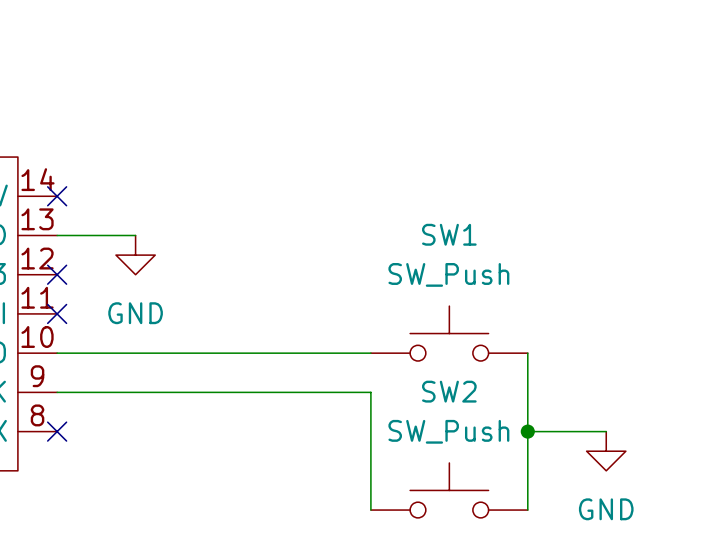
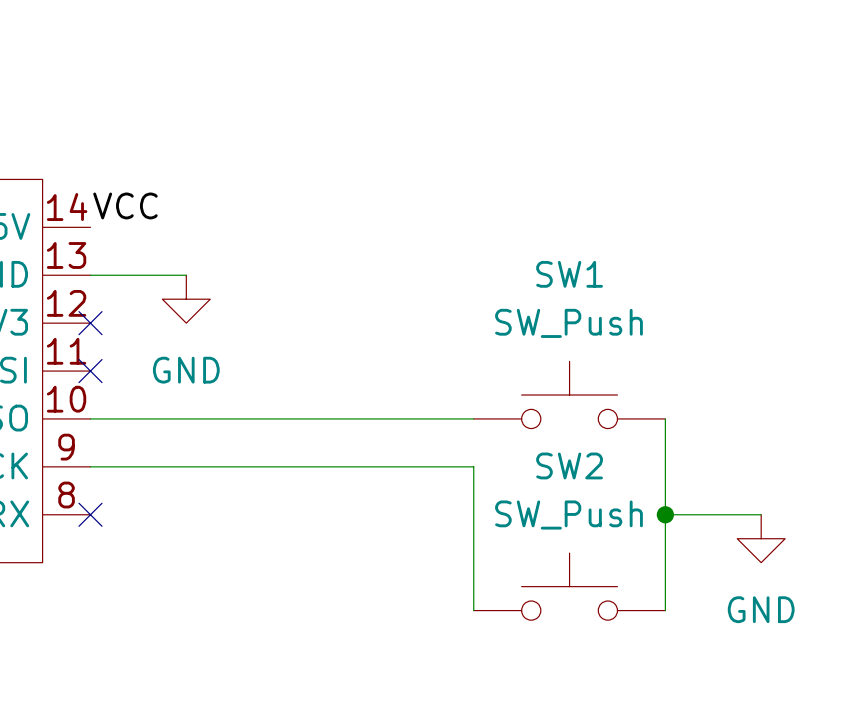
label: none -> VCC (125, 205)
no-connect mark: (57, 196) -> none

